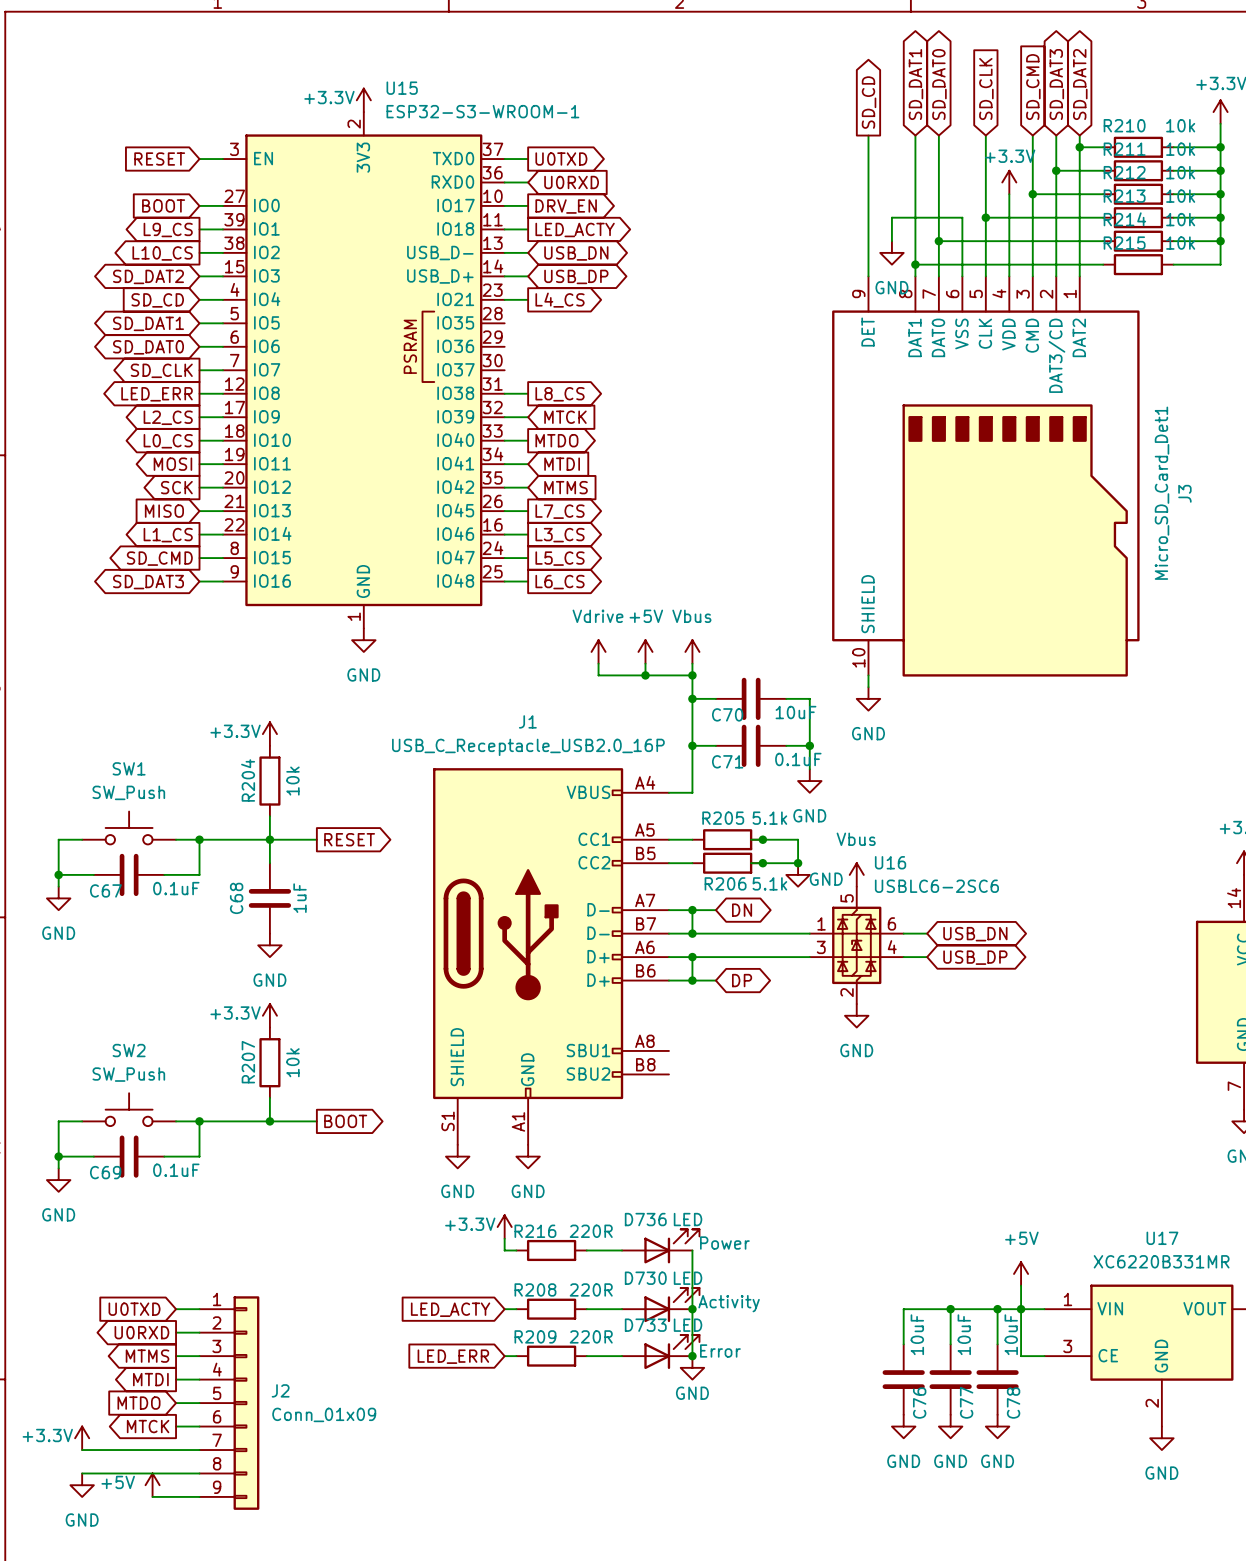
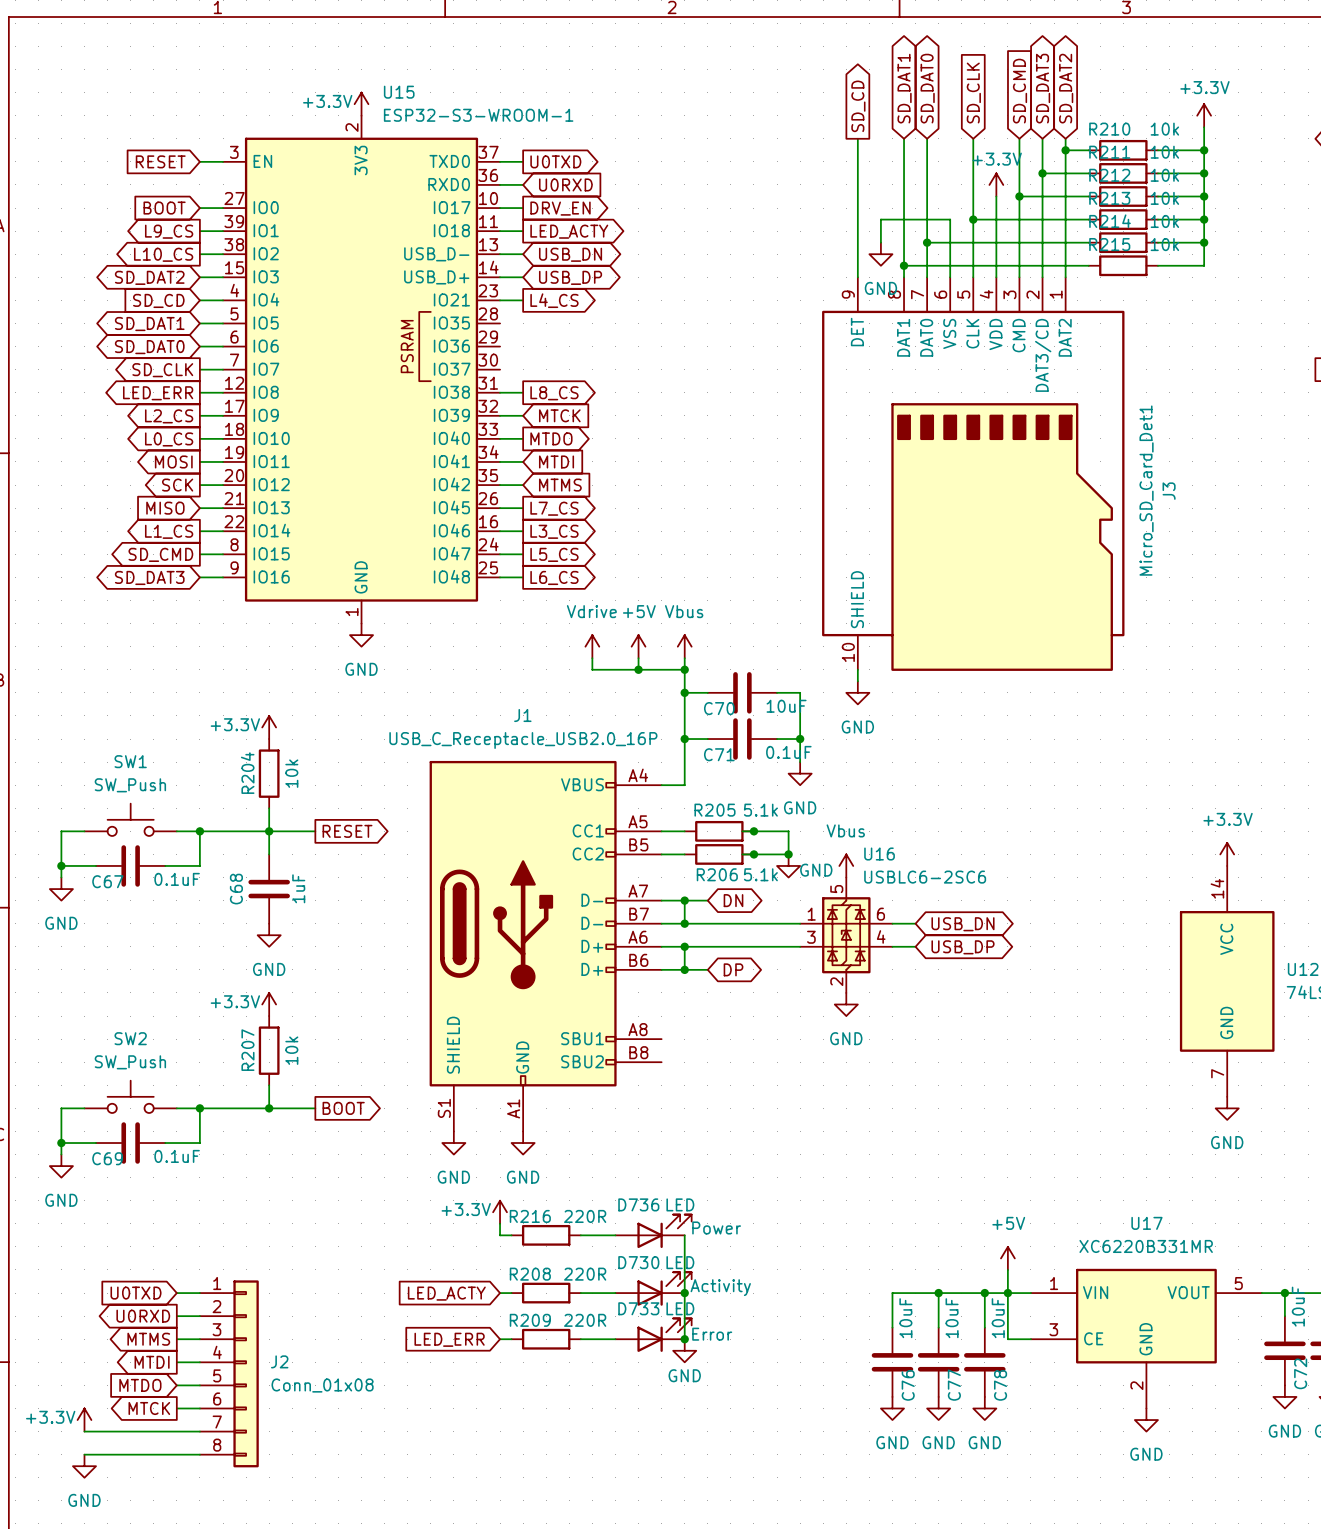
J2 symbol: [199, 1296, 260, 1510] -> [199, 1280, 259, 1468]
J2 value: Conn_01x09 (324, 1414) -> Conn_01x08 (322, 1385)
power symbol: +5V (152, 1485) -> none
wire: (152, 1496) (199, 1496) -> none

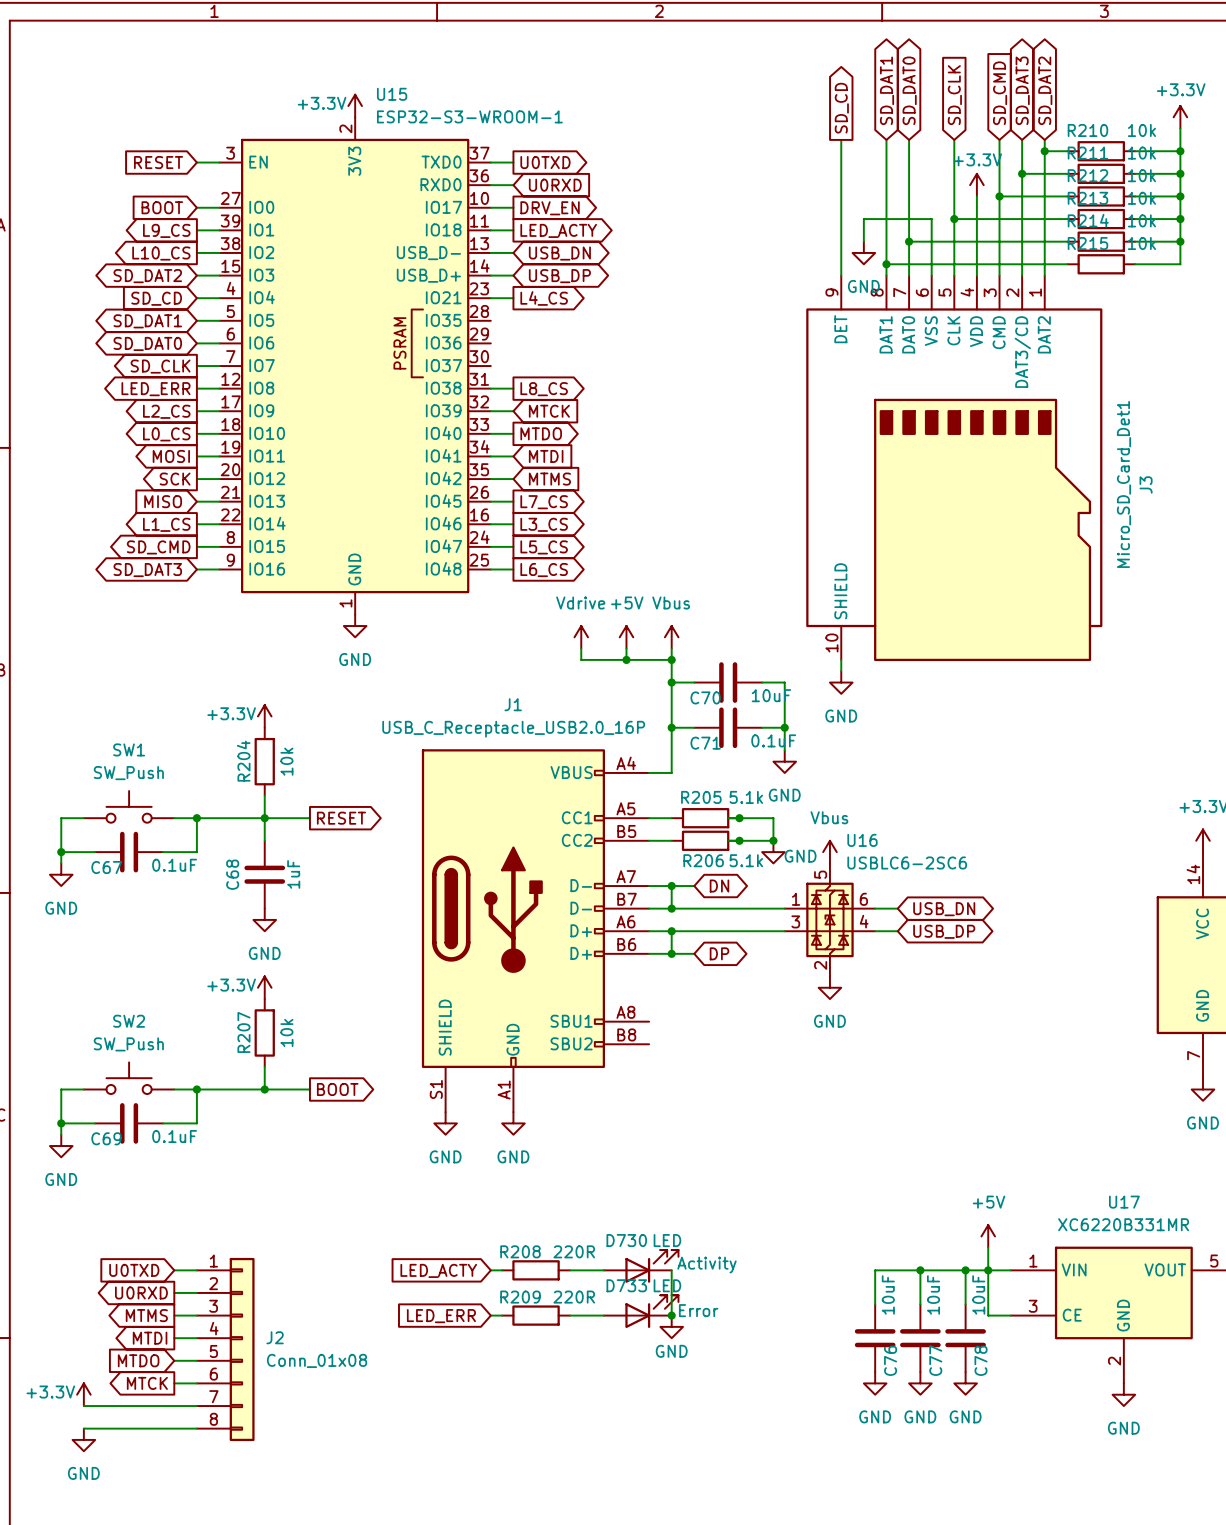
power symbol: +3.3V (500, 1212) -> none
wire: (500, 1223) (500, 1235) (511, 1235) -> none
D736: LED (653, 1231) -> none
R216: 220R (546, 1235) -> none
wire: (580, 1235) (615, 1235) -> none
wire: (684, 1235) (684, 1293) -> none
junction: (684, 1293) -> none

